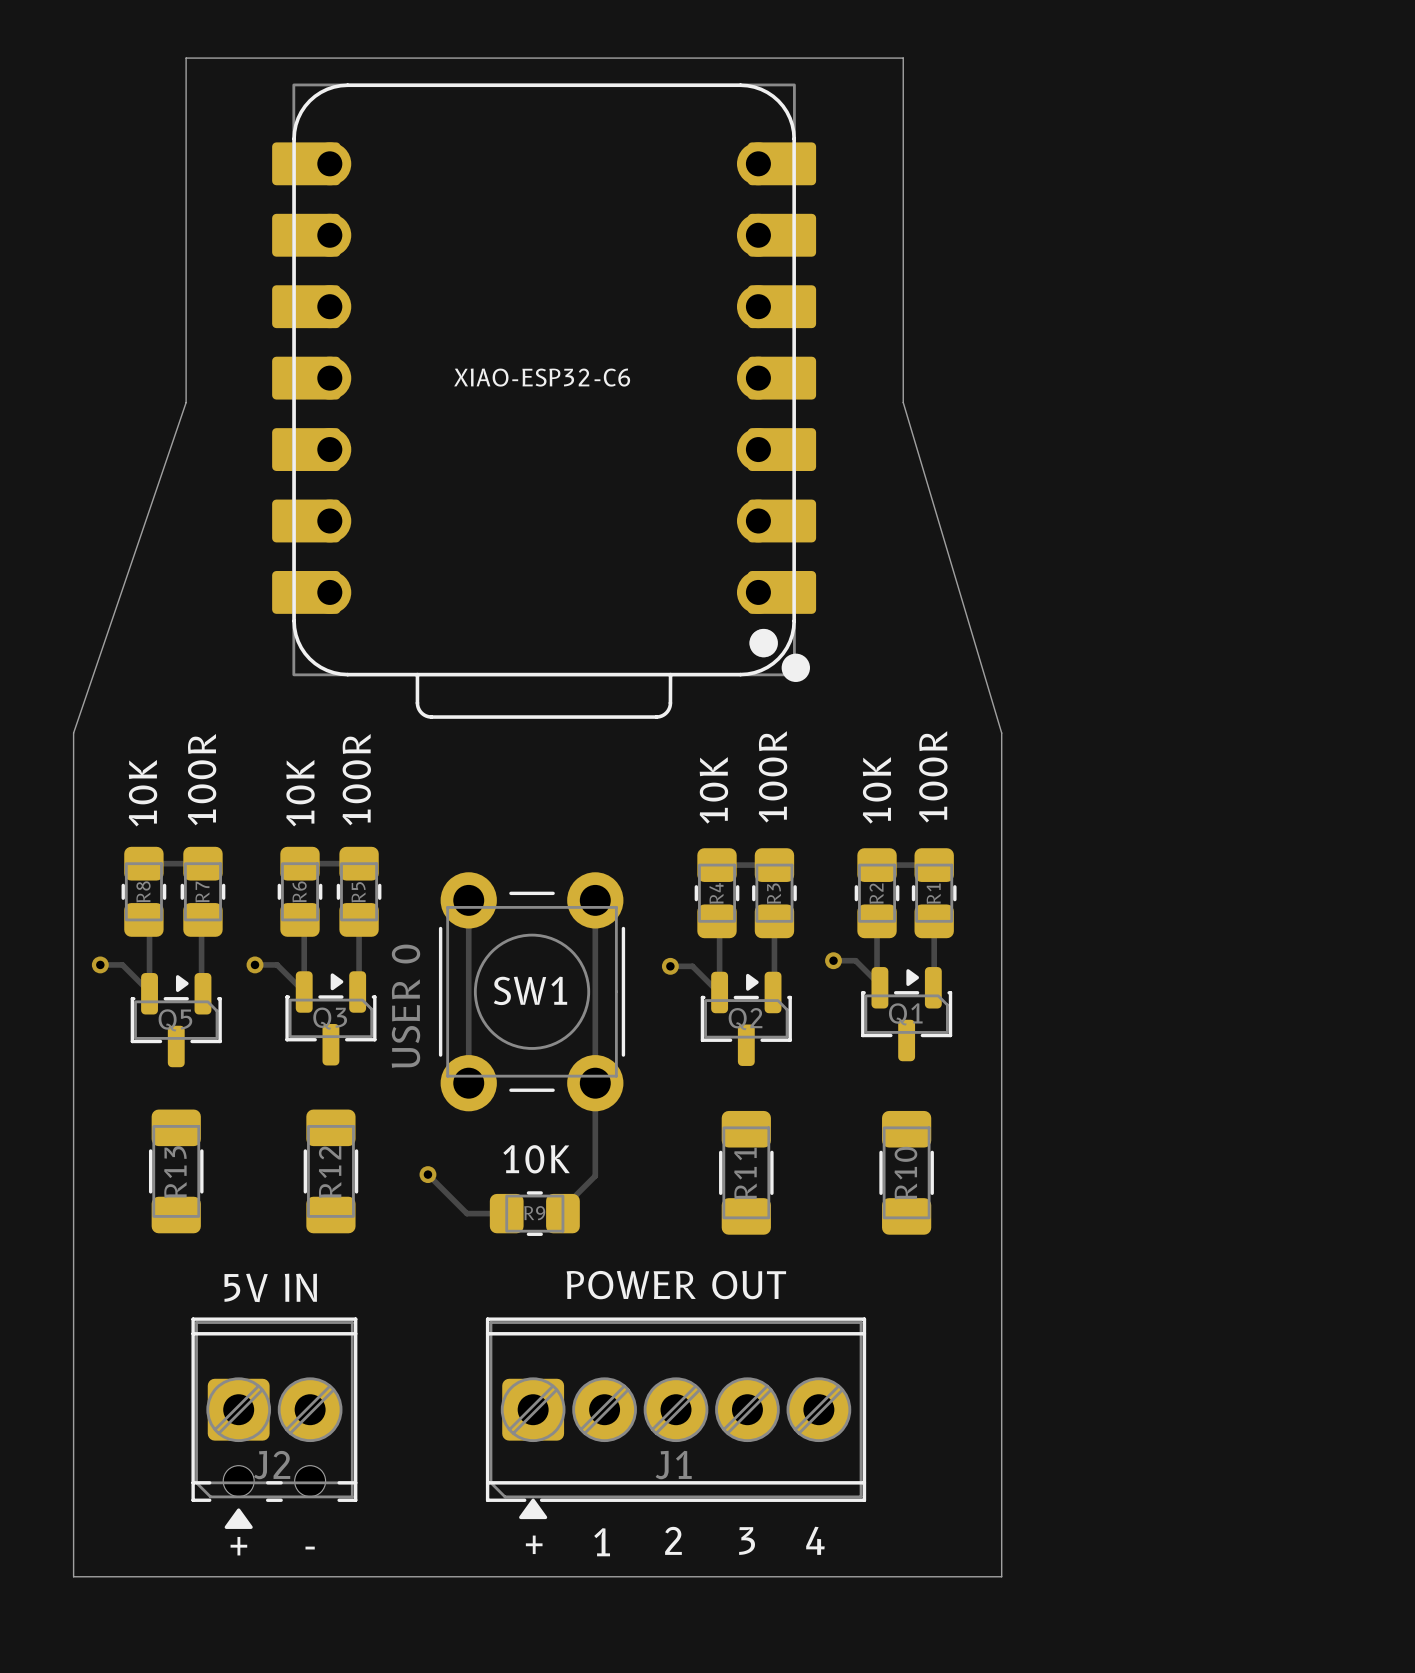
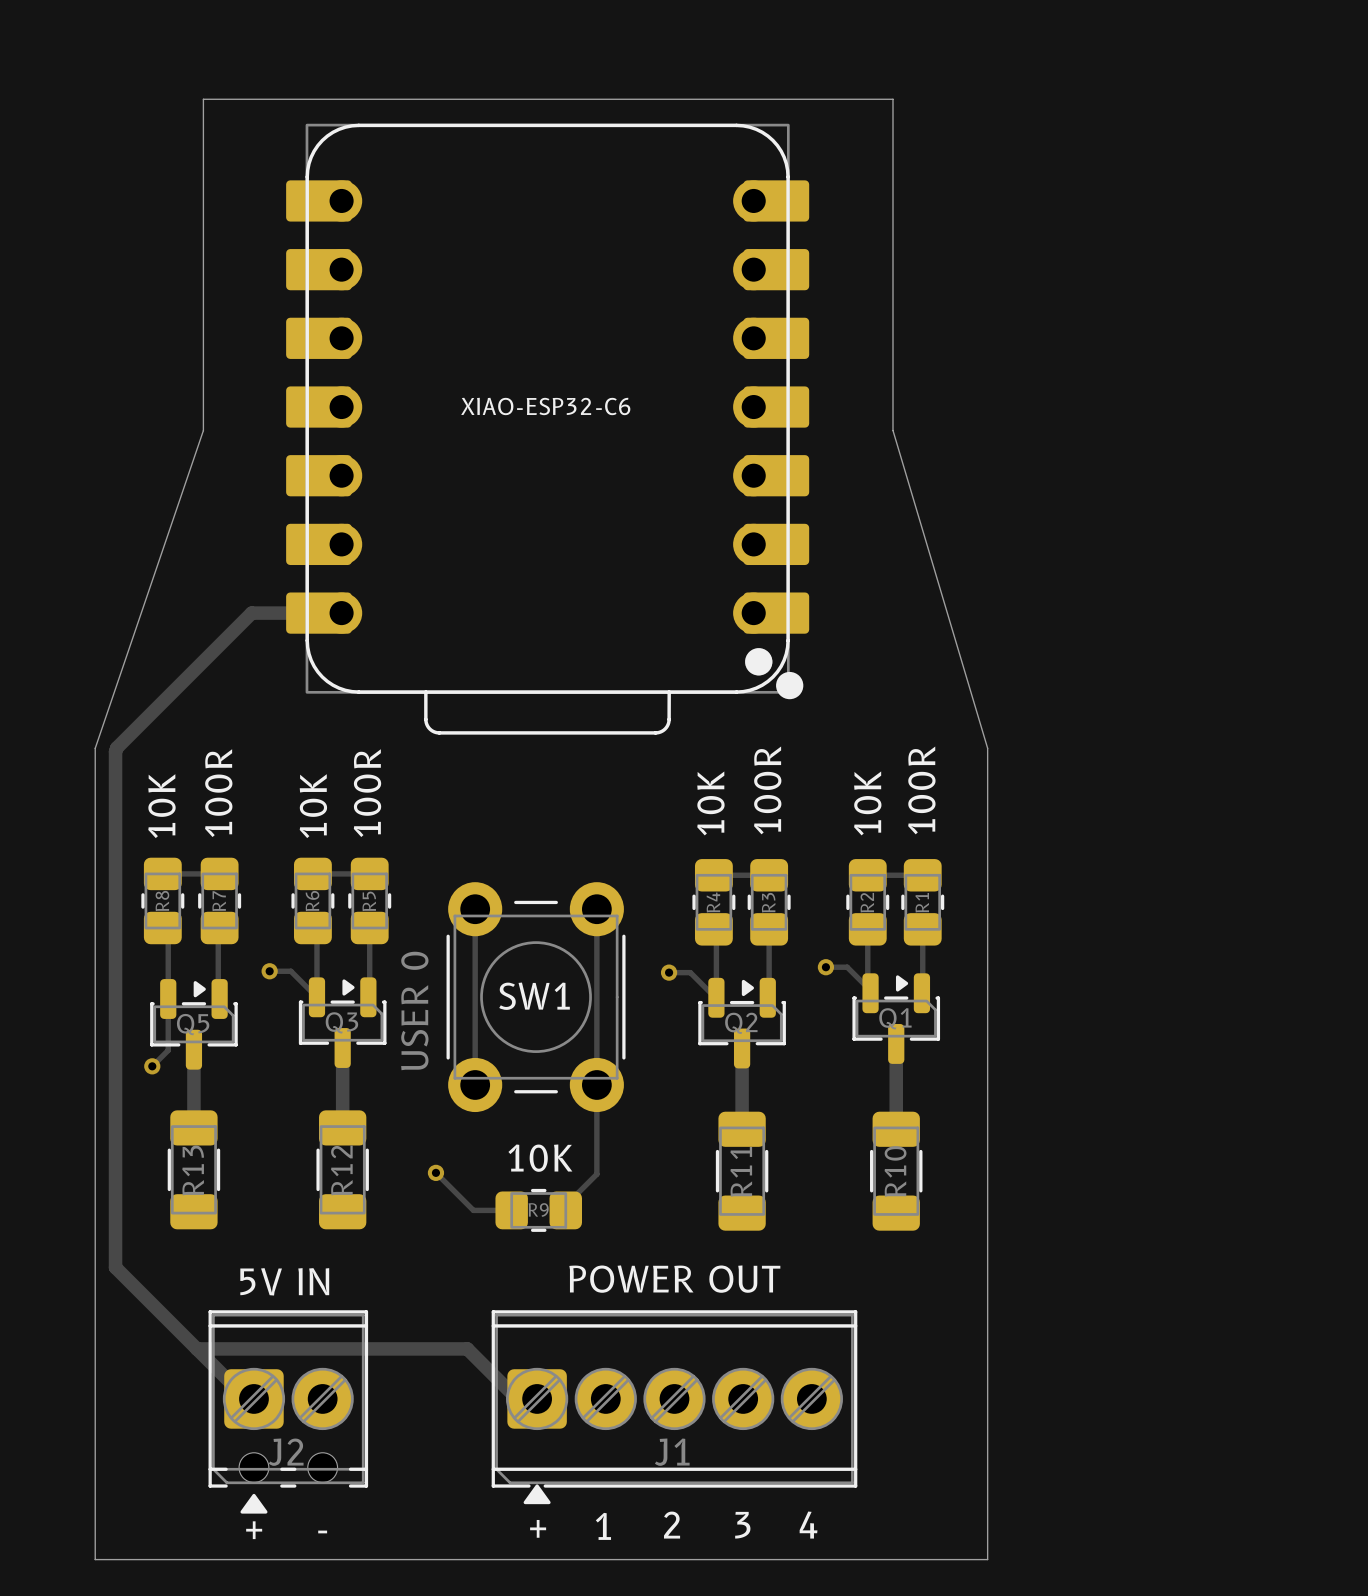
track: none -> (319, 613) (251, 613) (116, 748) (115, 751) (115, 1267) (246, 1398) (253, 1398) (253, 1389)
track: (100, 964) (122, 964) (149, 991) -> none
via position: (100, 964) -> (152, 1066)
track: none -> (168, 998) (168, 1050) (152, 1066)
track: none -> (896, 1043) (896, 1129)
track: none -> (342, 1048) (342, 1127)
track: none -> (742, 1048) (742, 1129)
track: none -> (193, 1049) (193, 1127)
track: none -> (196, 1348) (467, 1348) (517, 1398) (537, 1398)

